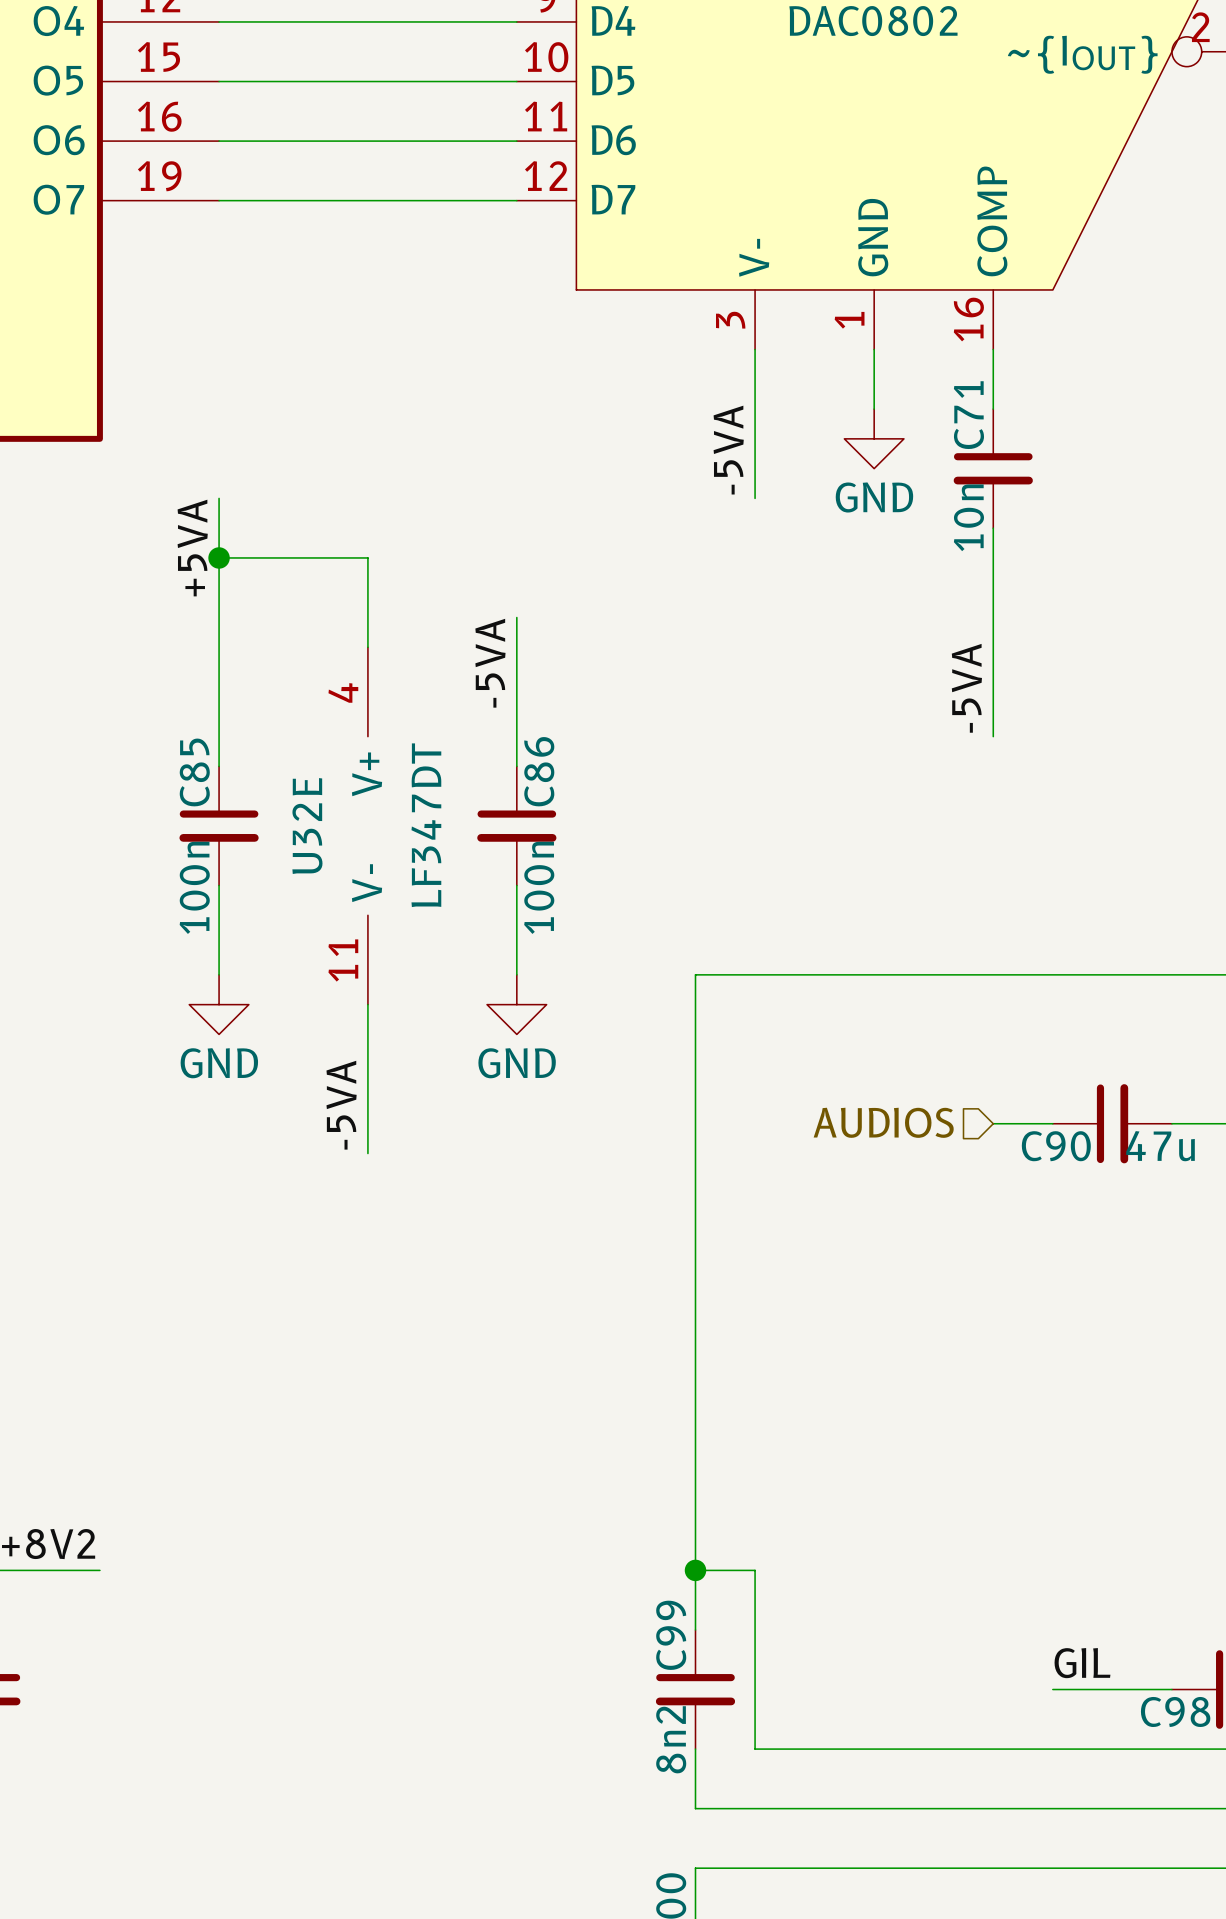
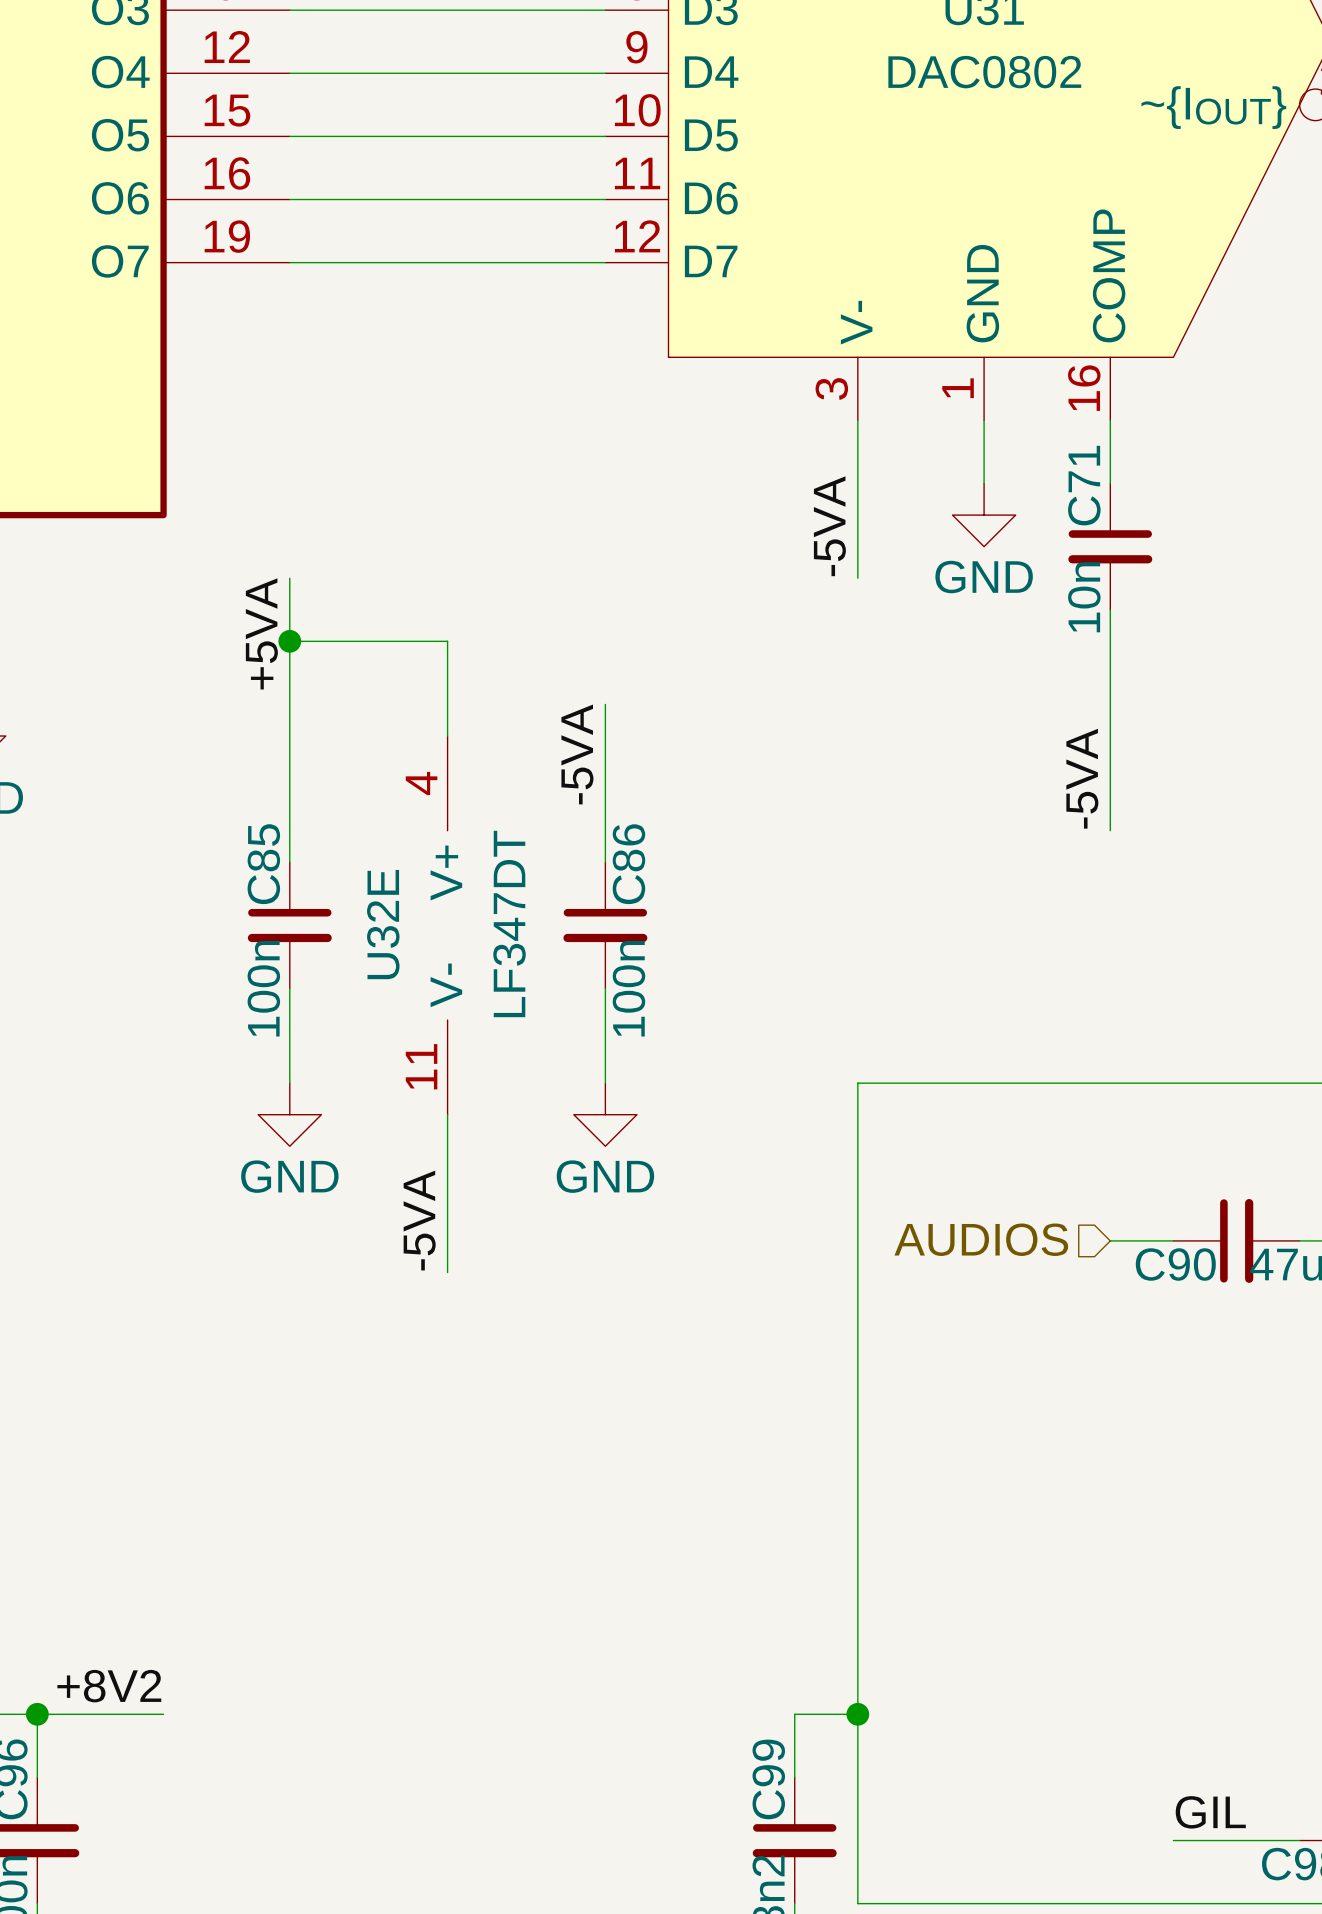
wire: (755, 974) (695, 974) (695, 1570) -> (857, 1083) (857, 1714)
junction position: (695, 1570) -> (857, 1714)

